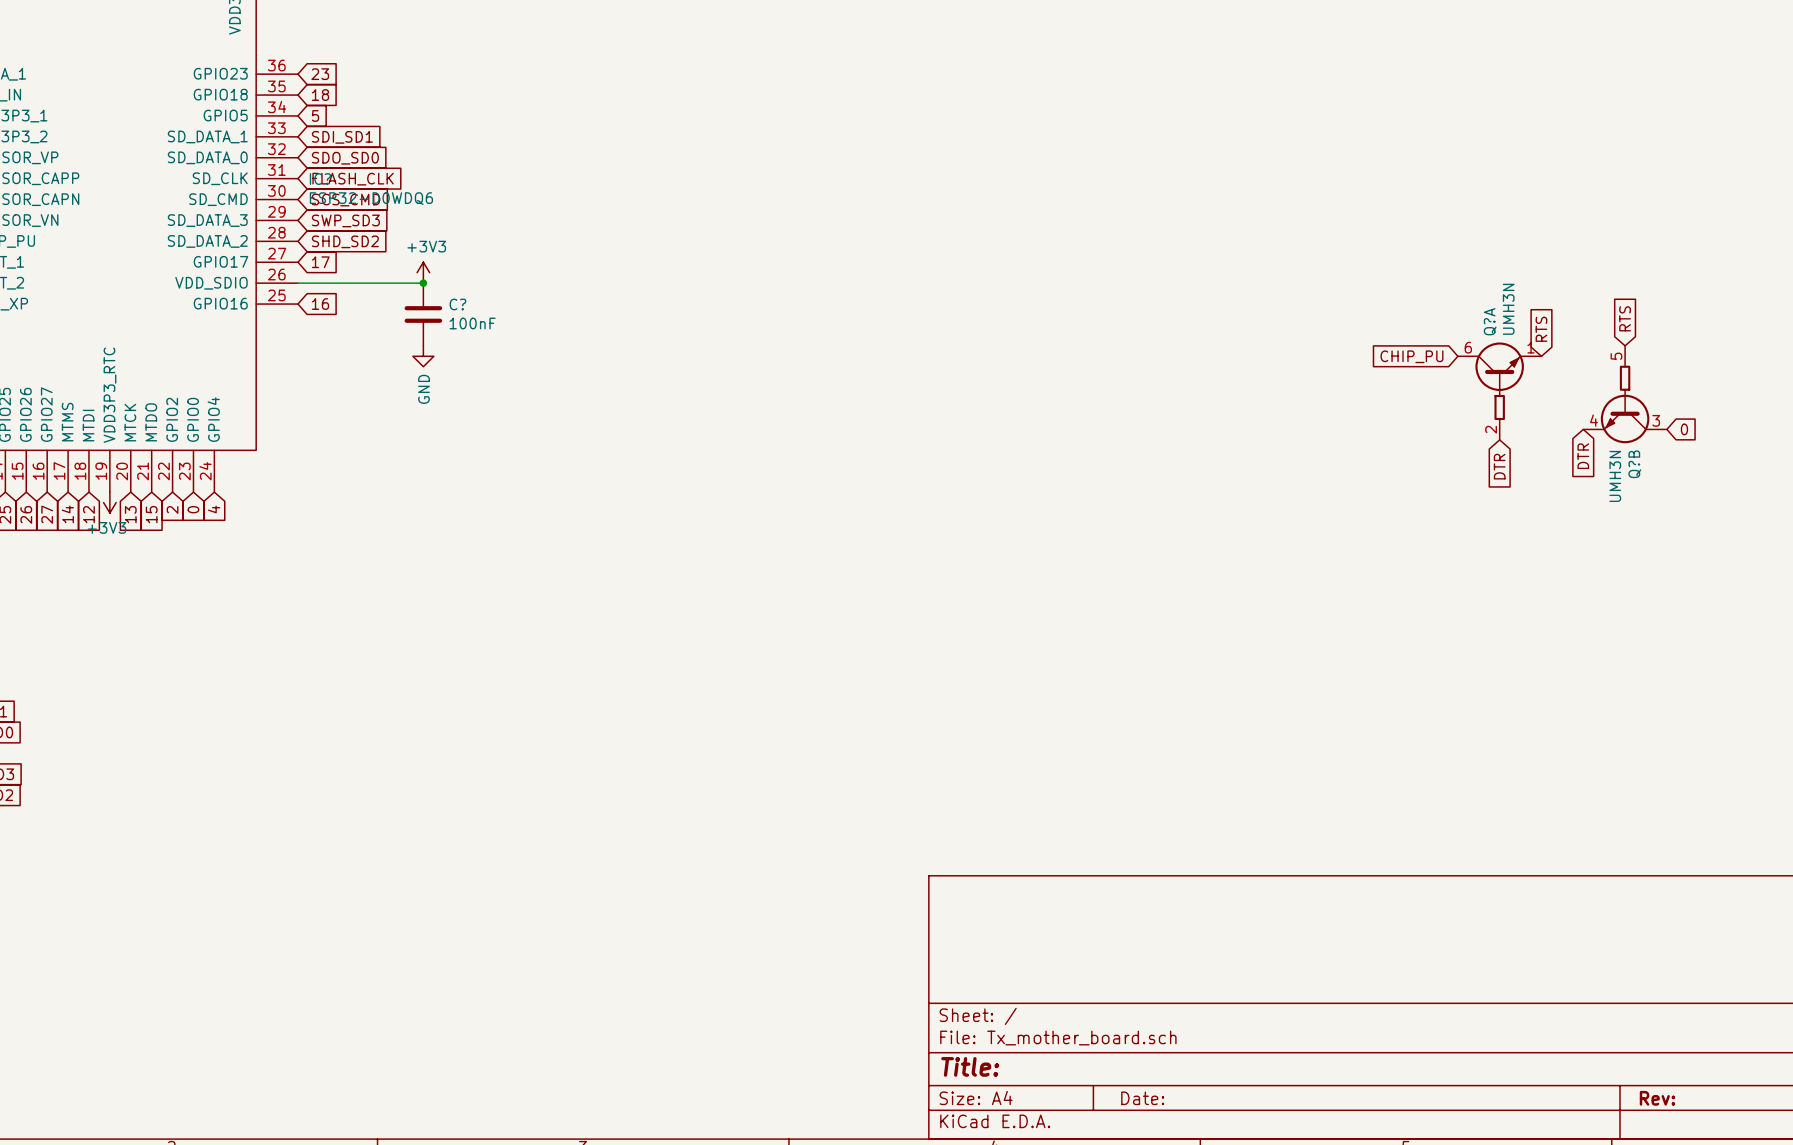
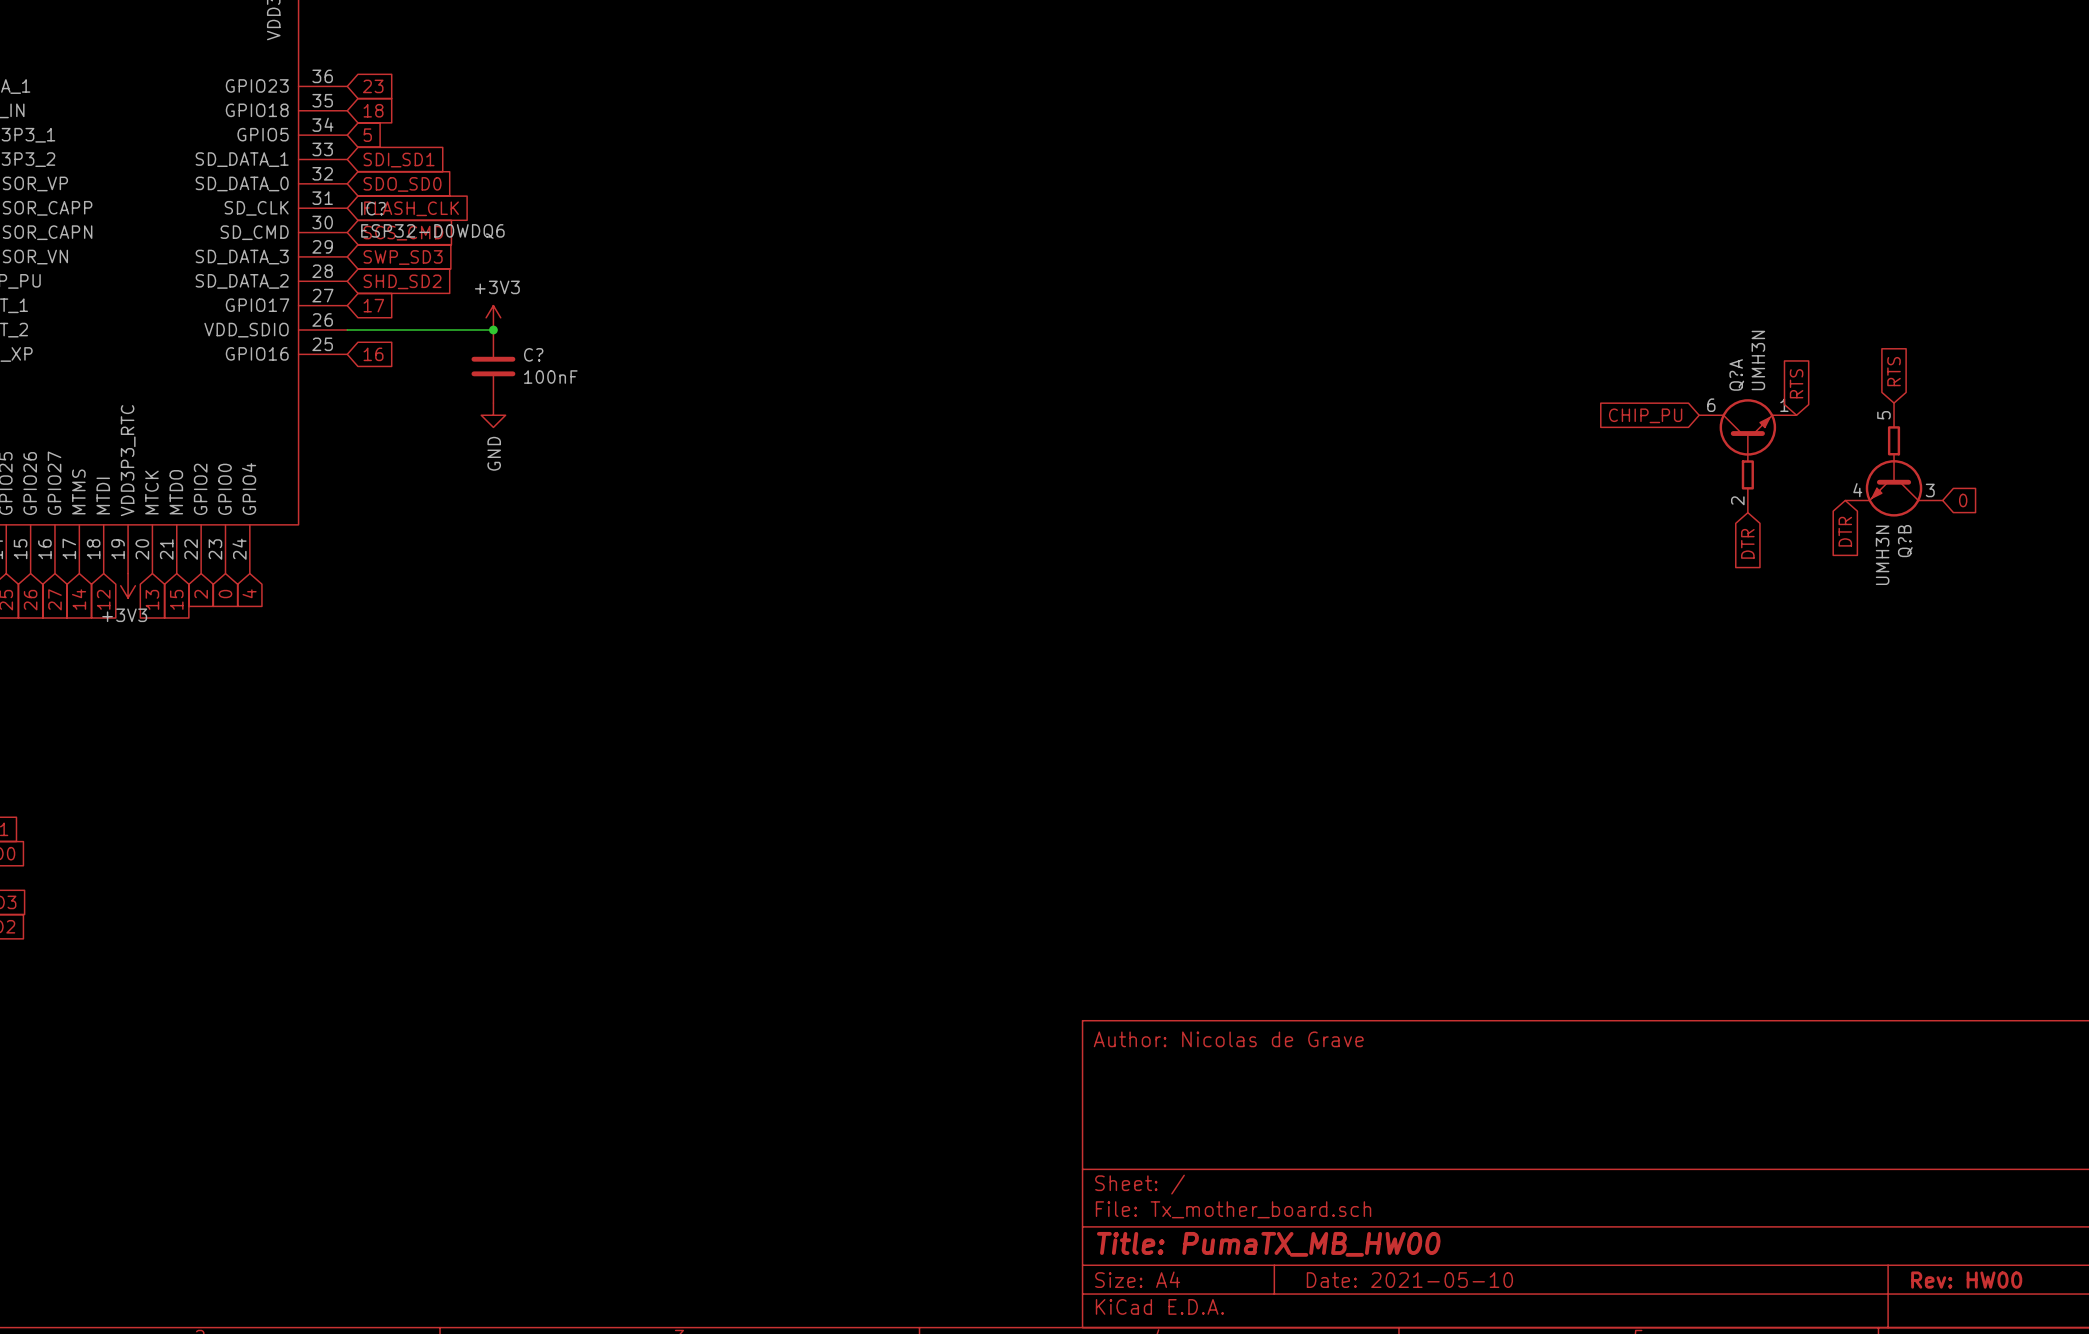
title block: none -> Author: Nicolas de Grave (1228, 1039)
title block: Title: (970, 1066) -> Title: PumaTX_MB_HW00 (1268, 1244)
title block: Date: (1142, 1098) -> Date: 2021-05-10 (1409, 1280)
title block: Rev: (1657, 1098) -> Rev: HW00 (1966, 1280)

